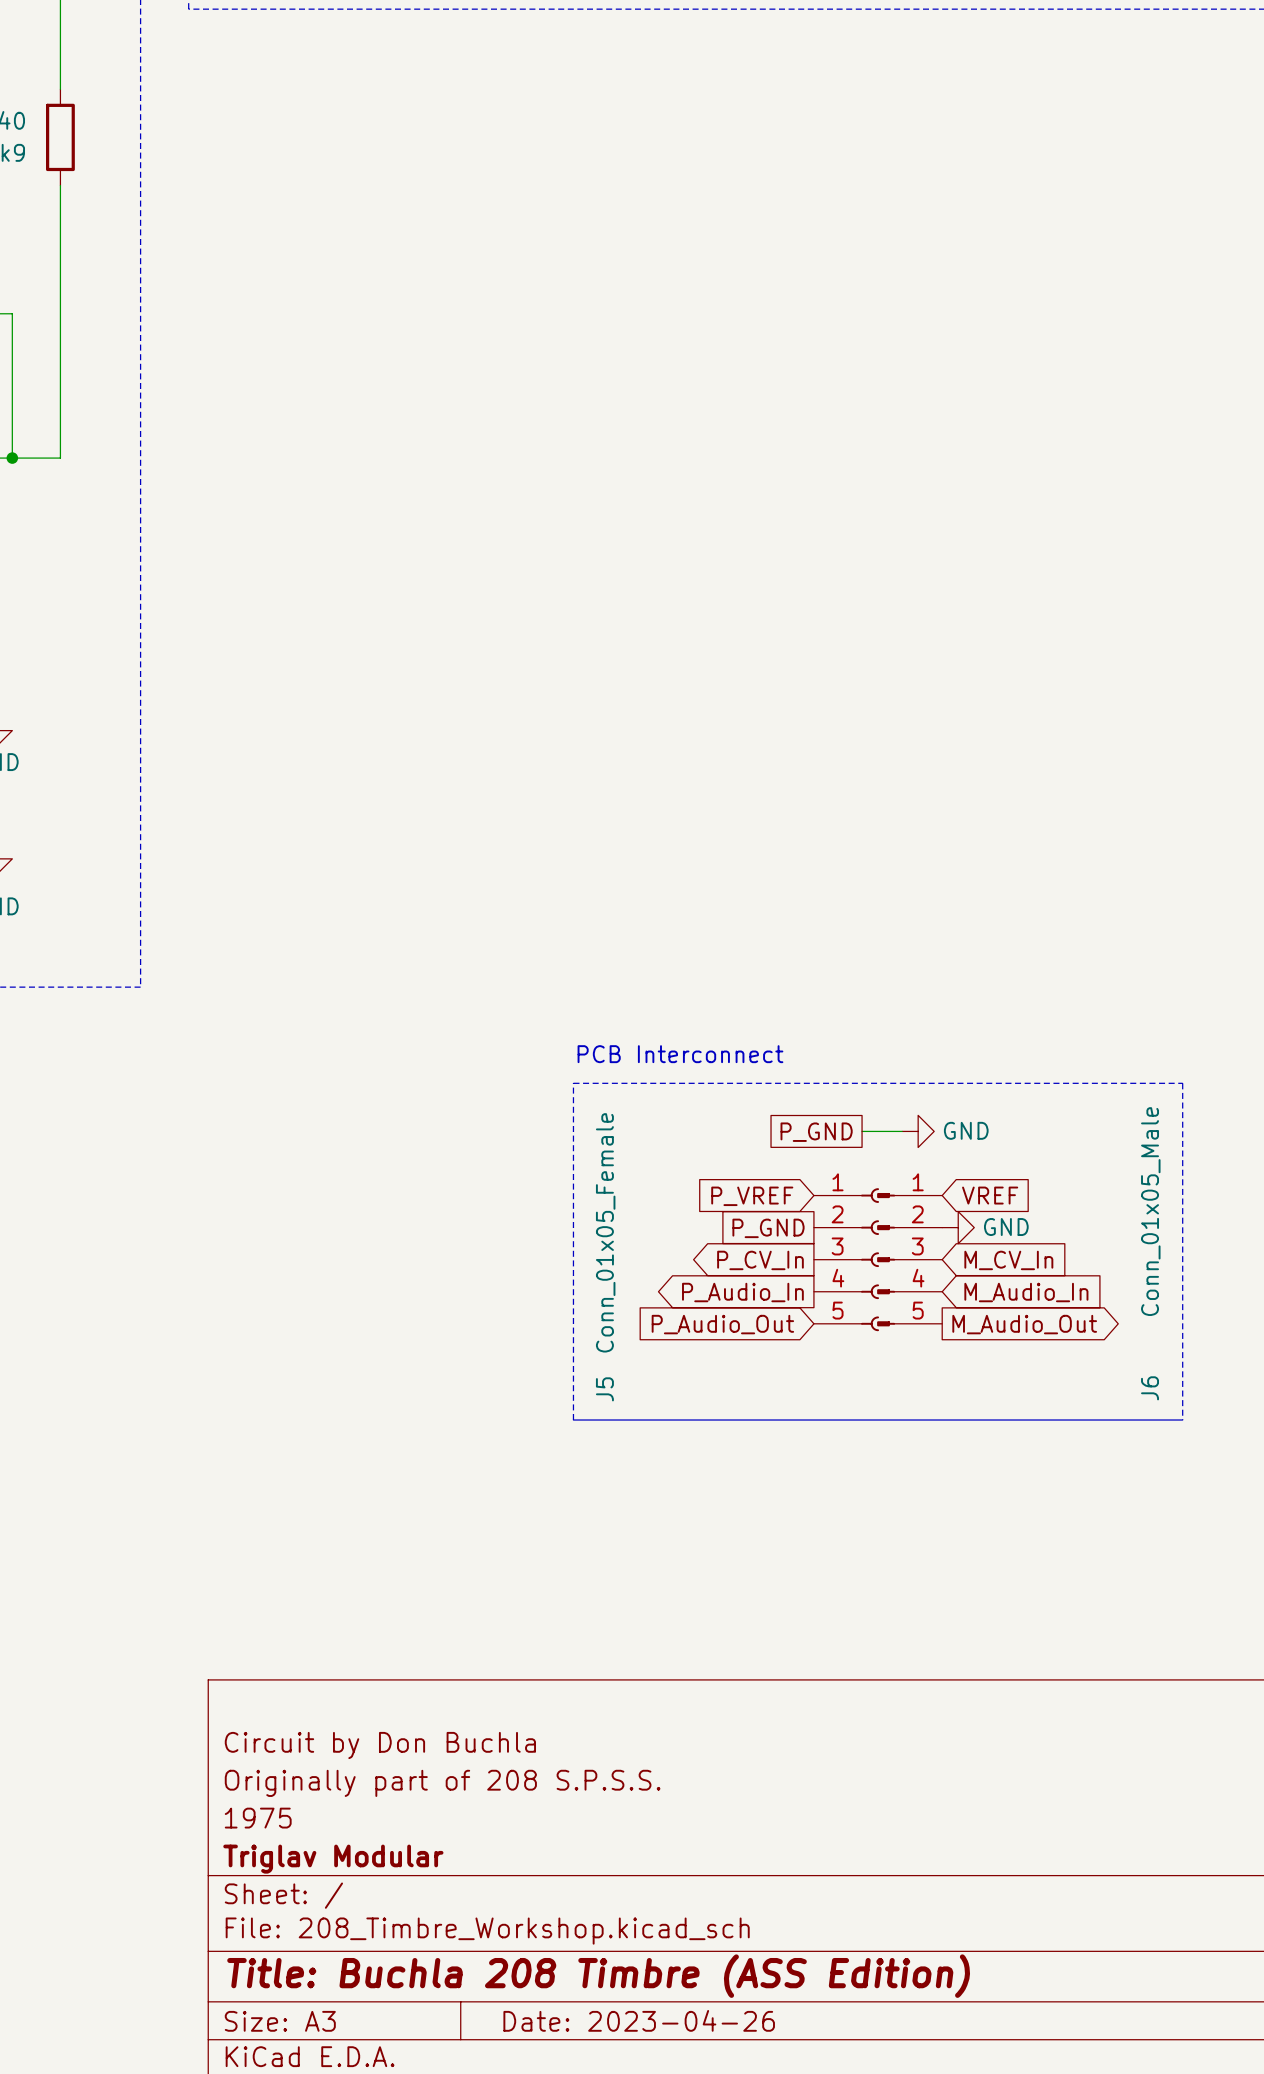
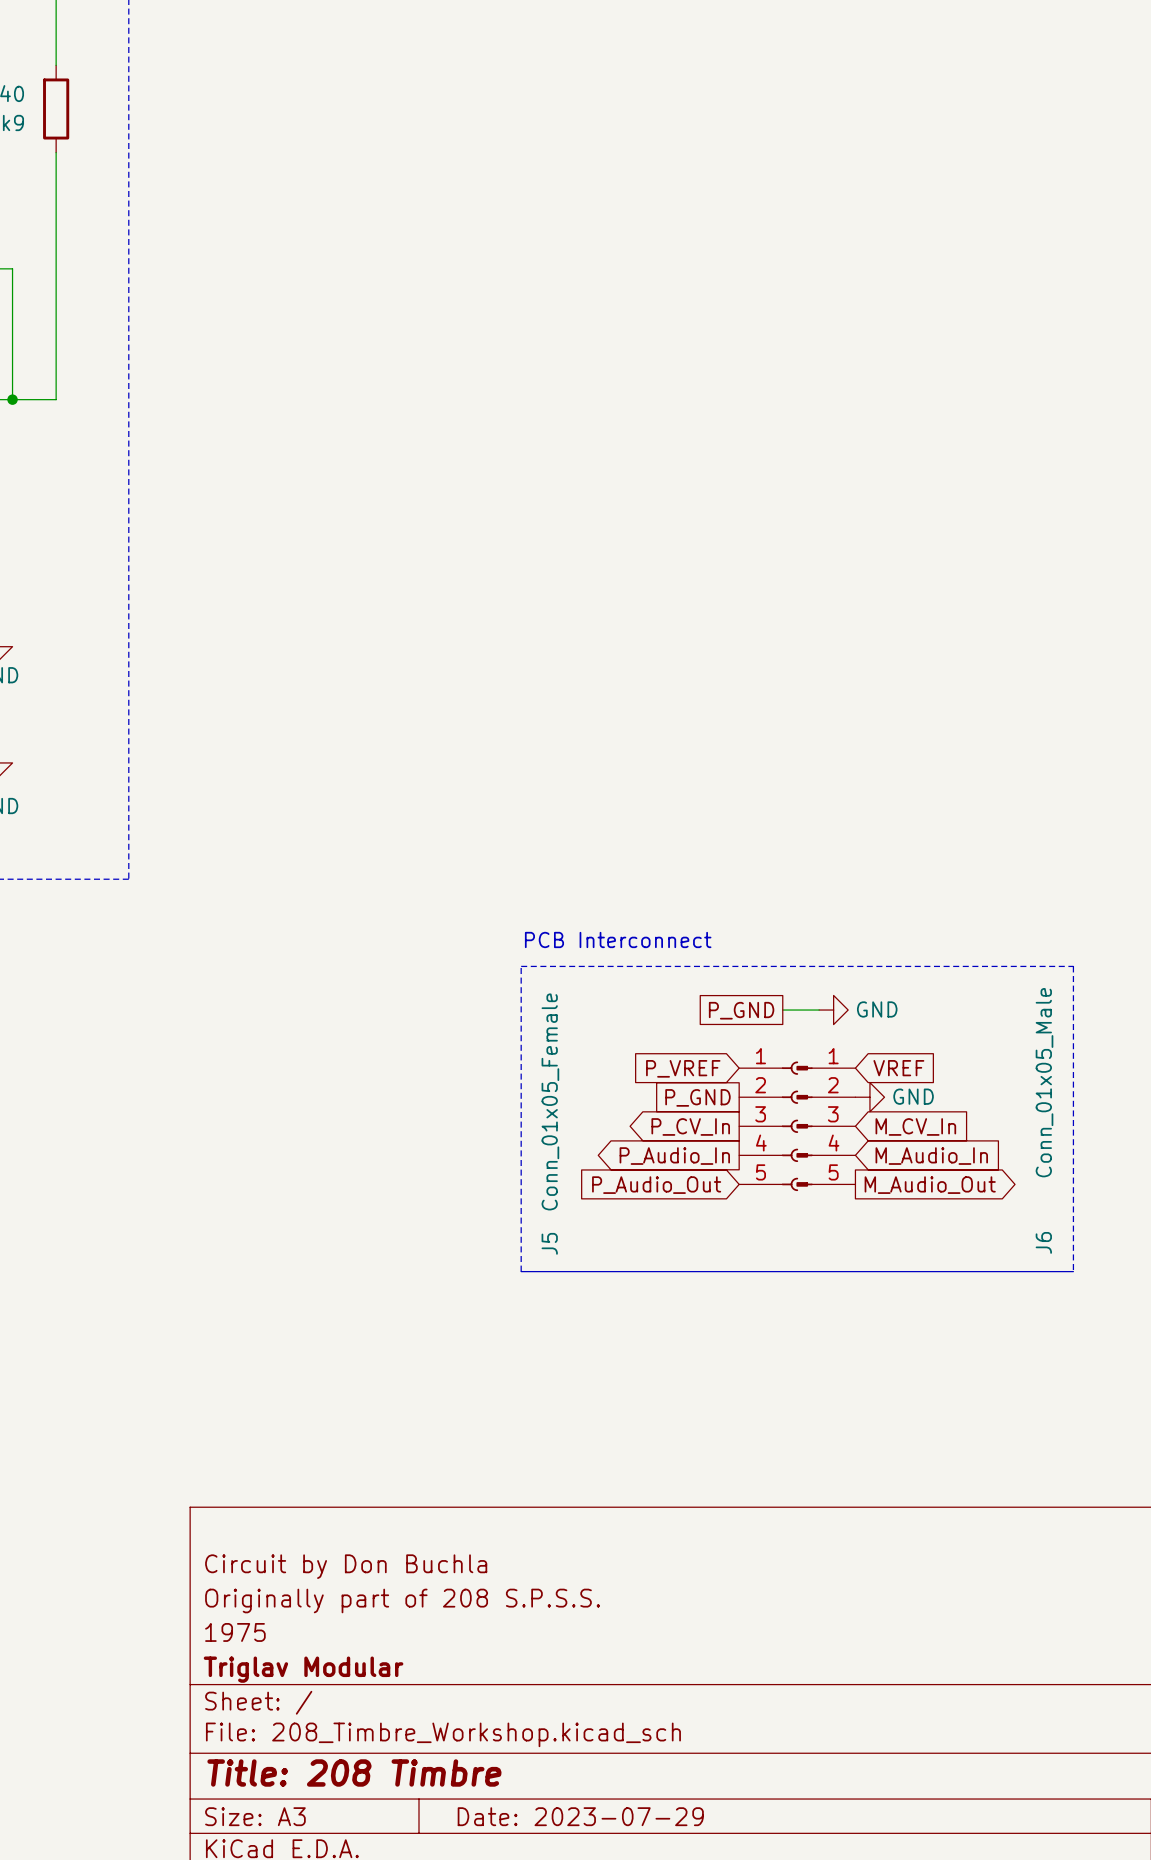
title block: Title: Buchla 208 Timbre (ASS Edition) (598, 1976) -> Title: 208 Timbre (354, 1772)
title block: Date: 2023-04-26 (639, 2020) -> Date: 2023-07-29 (580, 1816)

